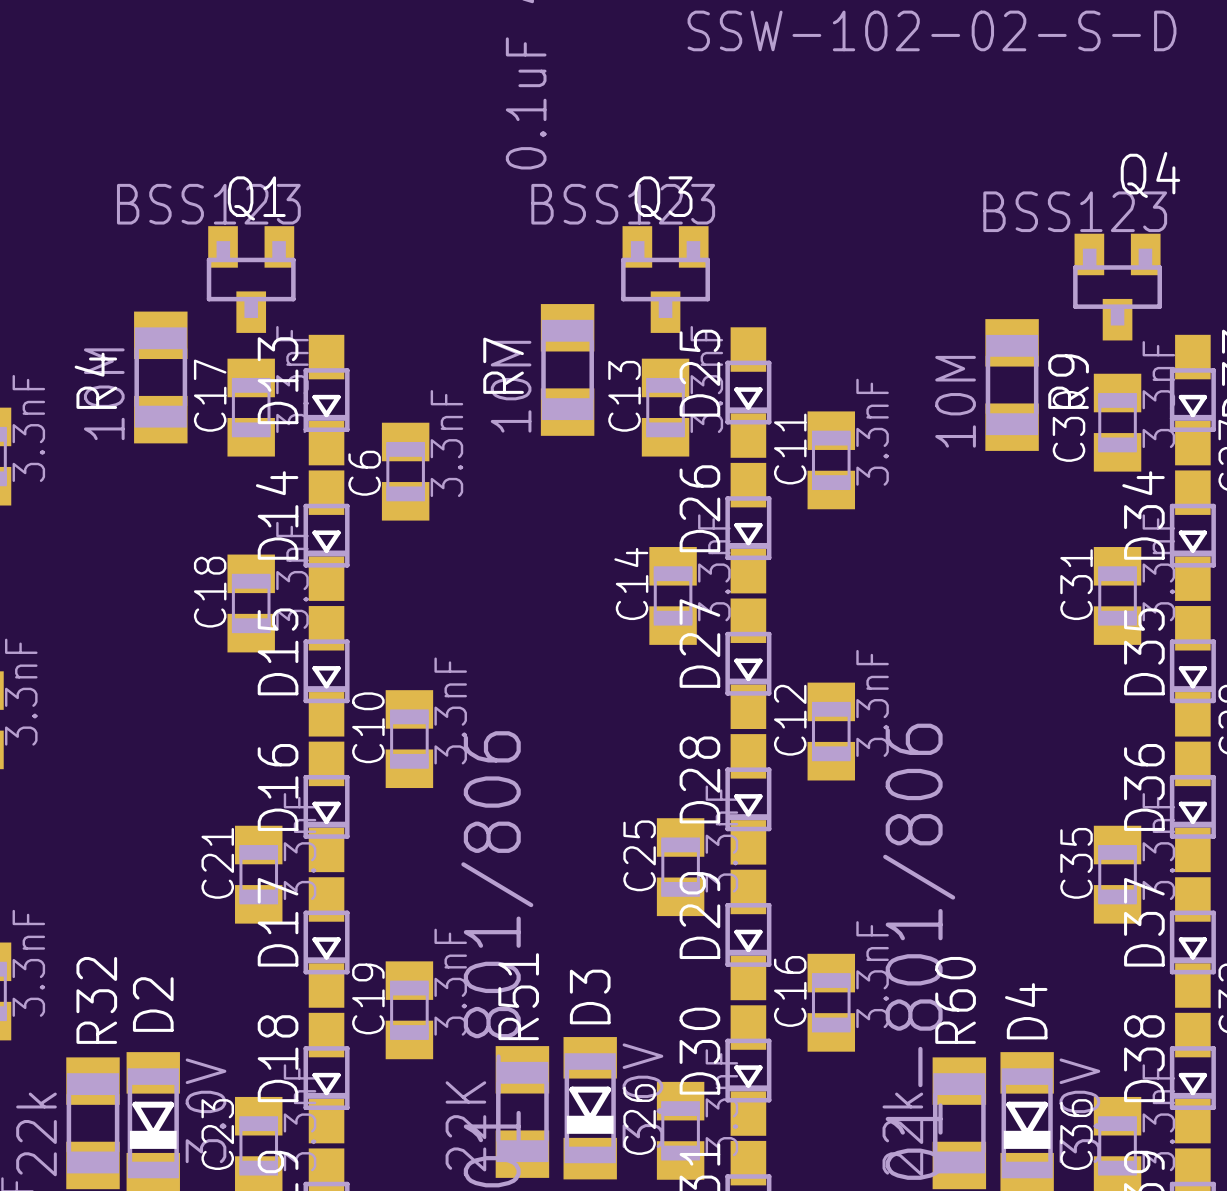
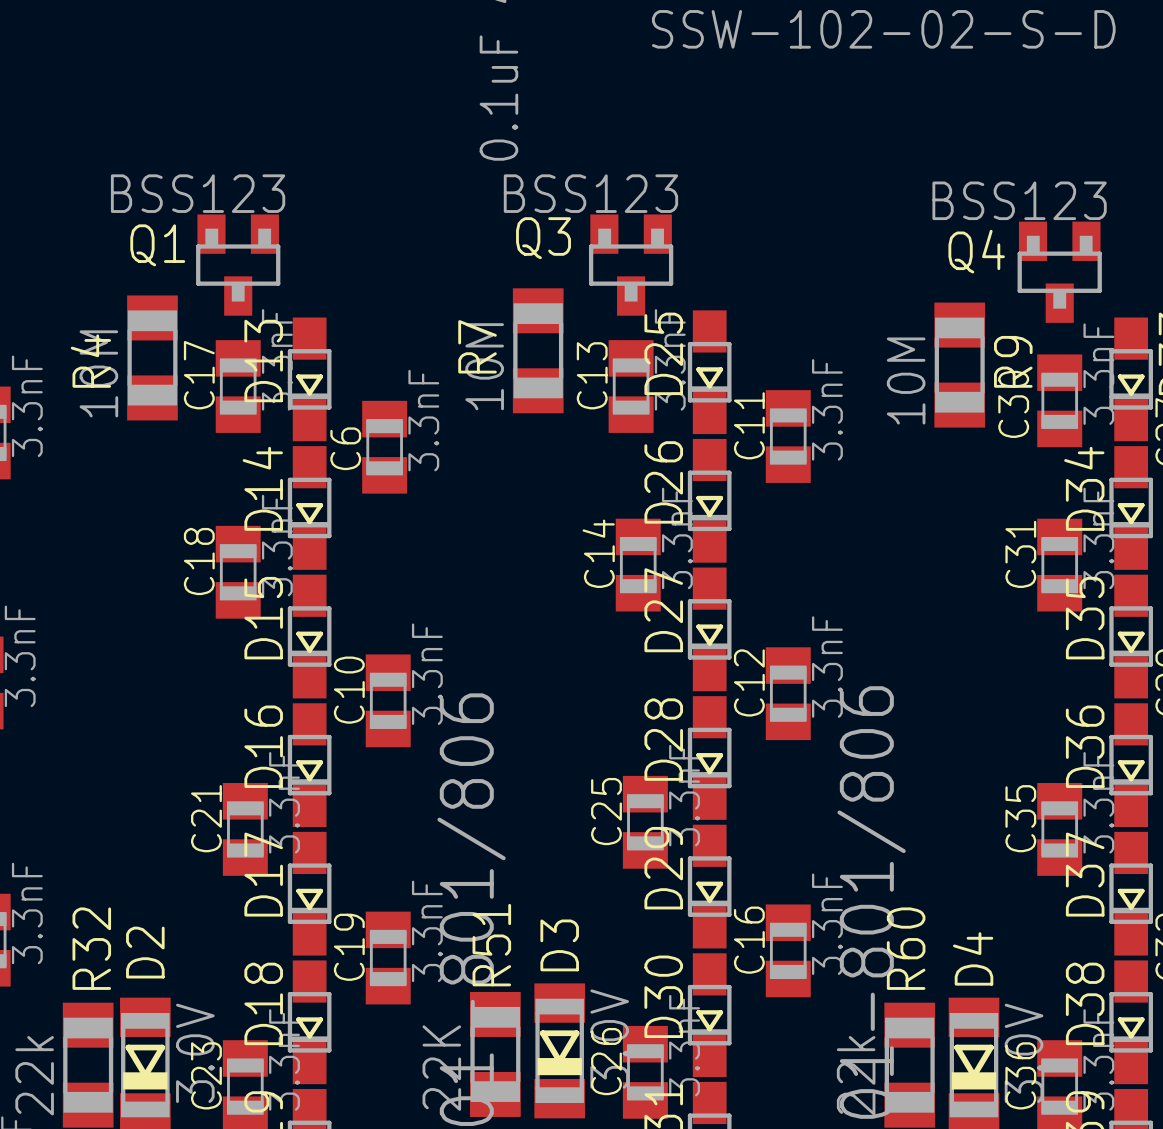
Q4 name position: Q4 (1150, 174) -> Q4 (976, 251)
Q1 name position: Q1 (256, 198) -> Q1 (157, 245)
Q3 name position: Q3 (663, 198) -> Q3 (543, 238)

